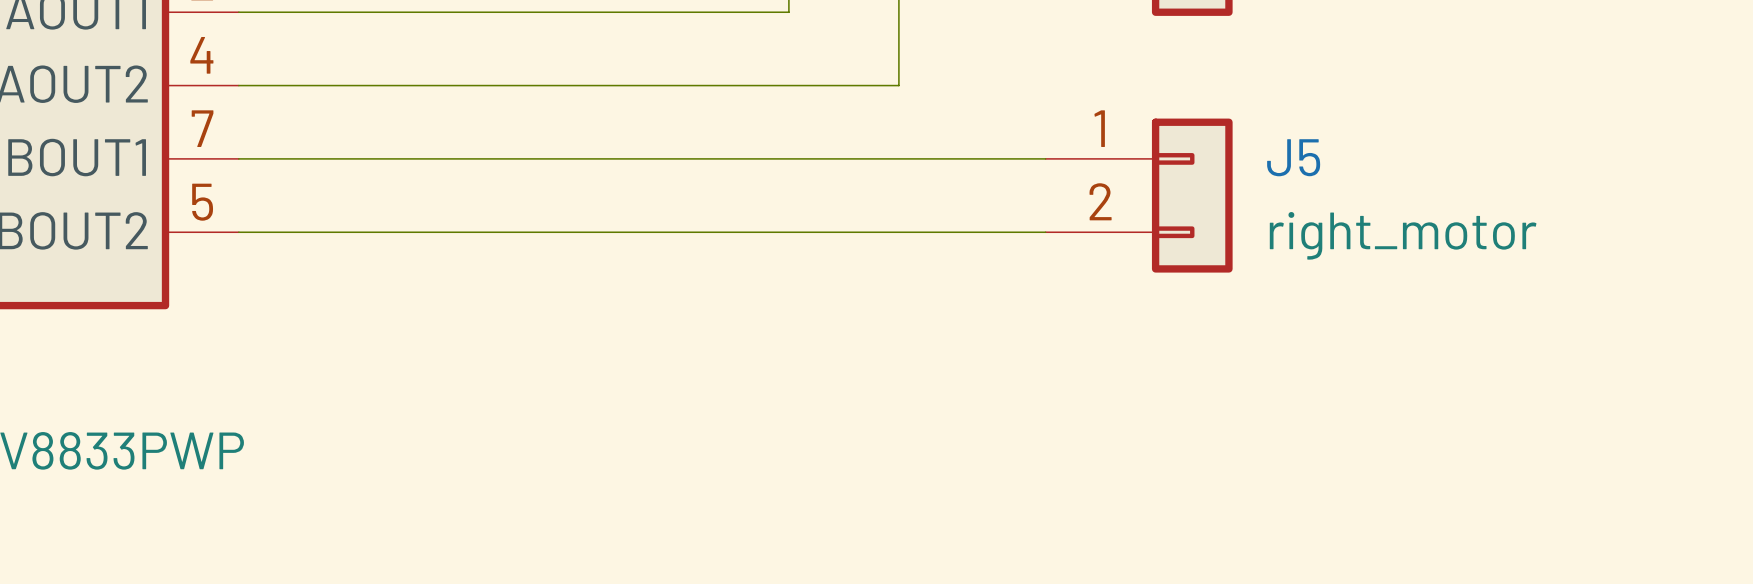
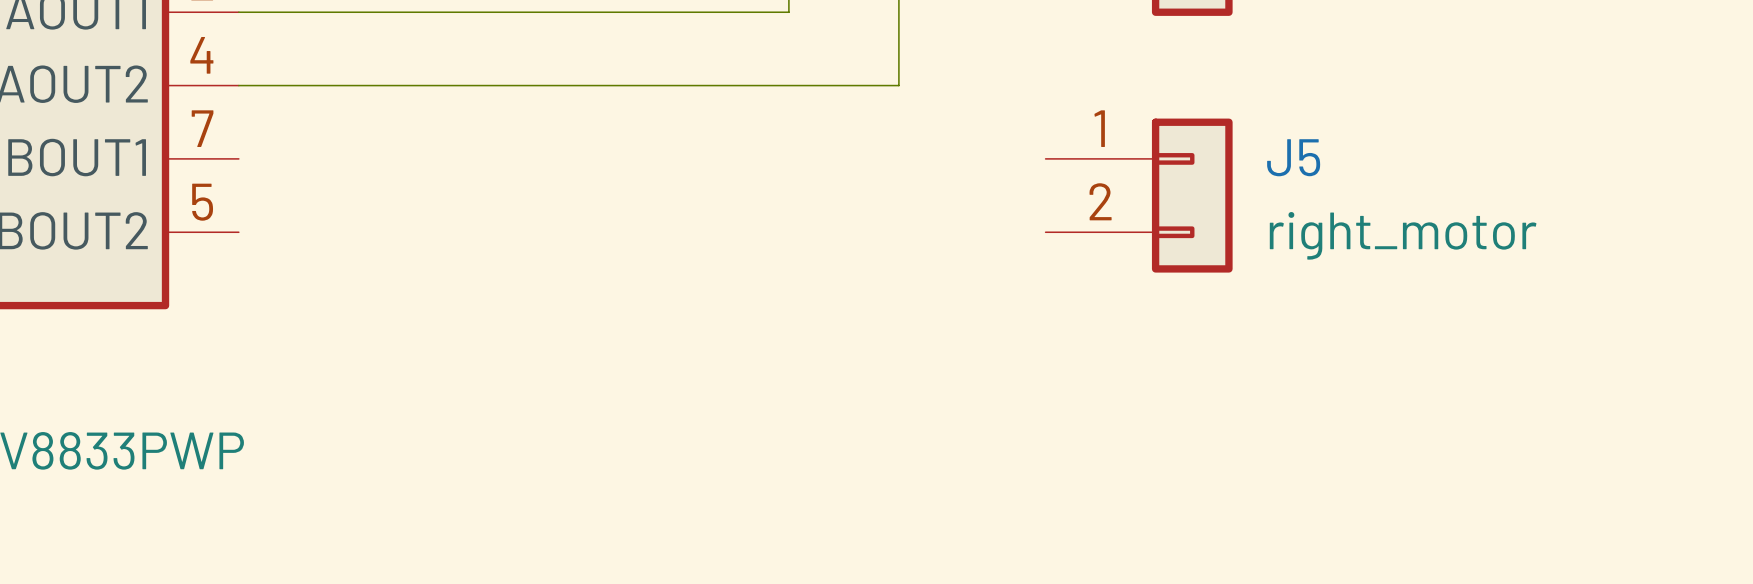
wire: (238, 158) (1045, 158) -> none
wire: (238, 232) (1045, 232) -> none

